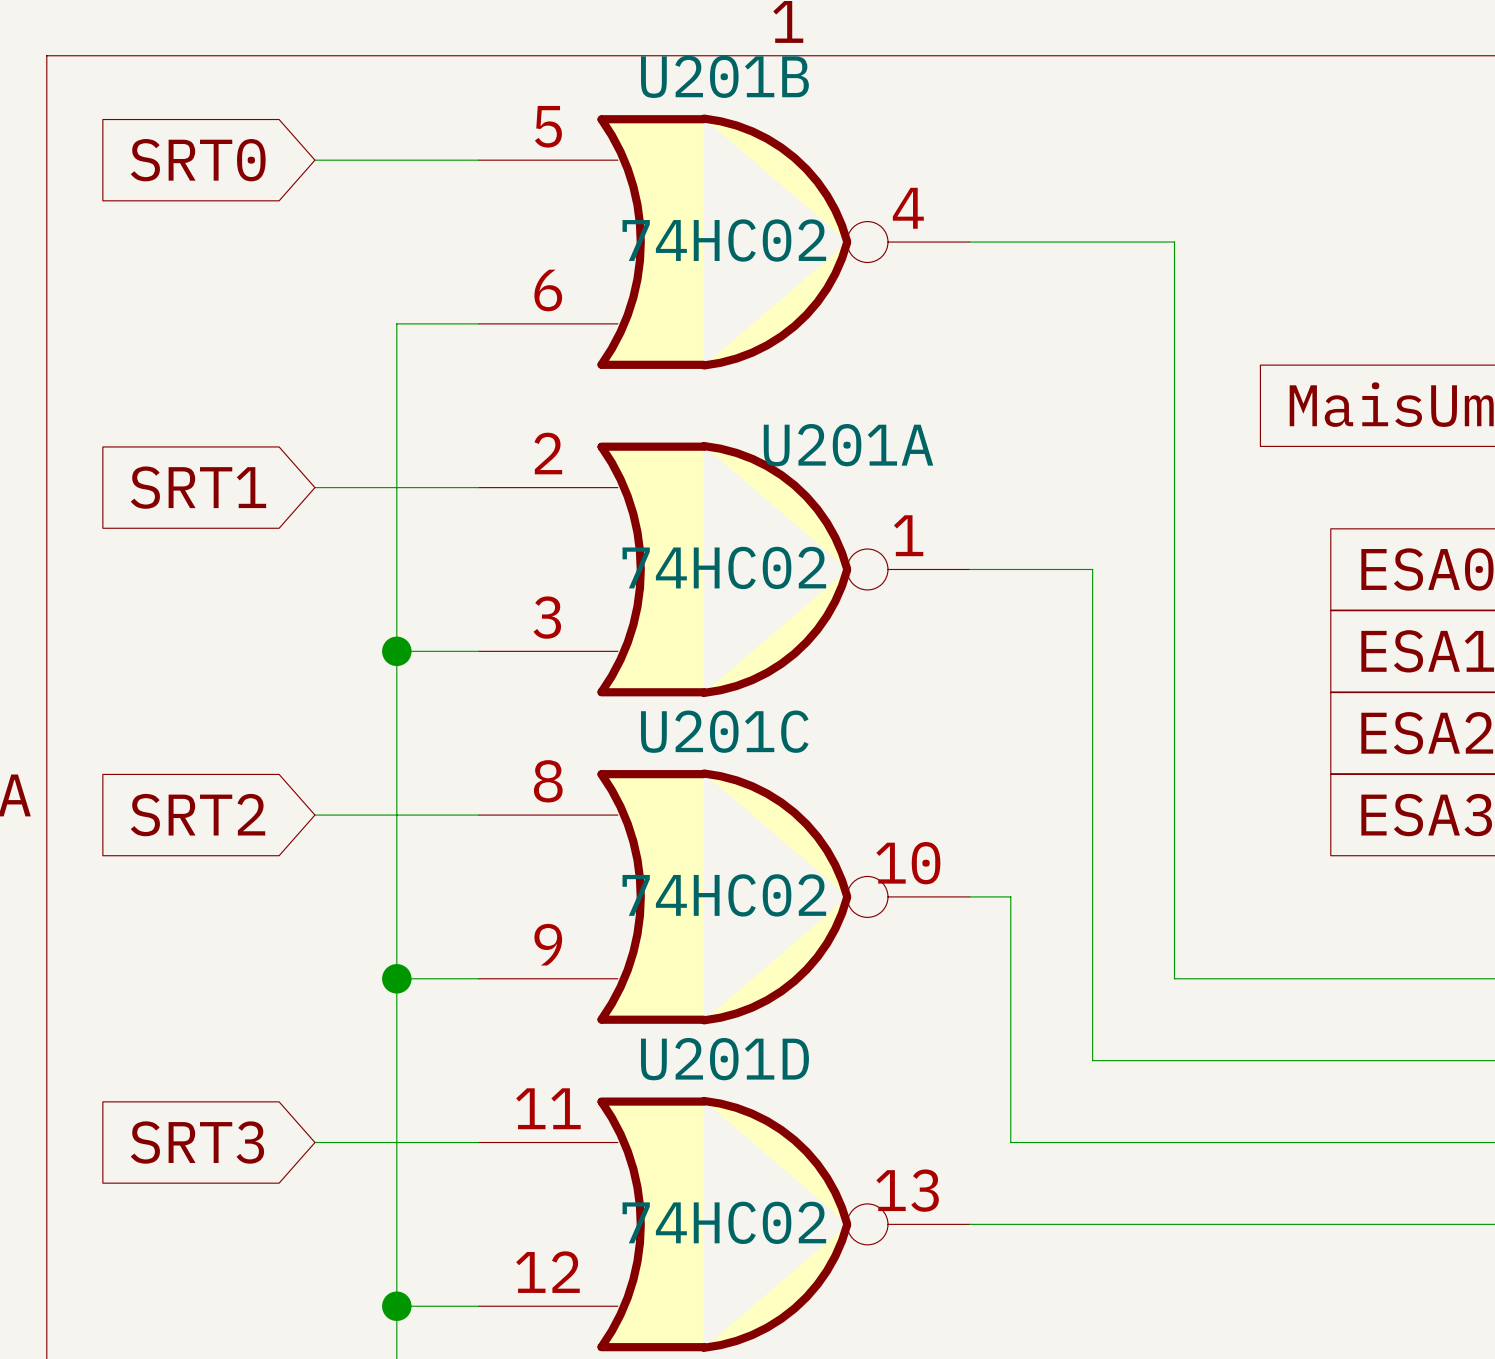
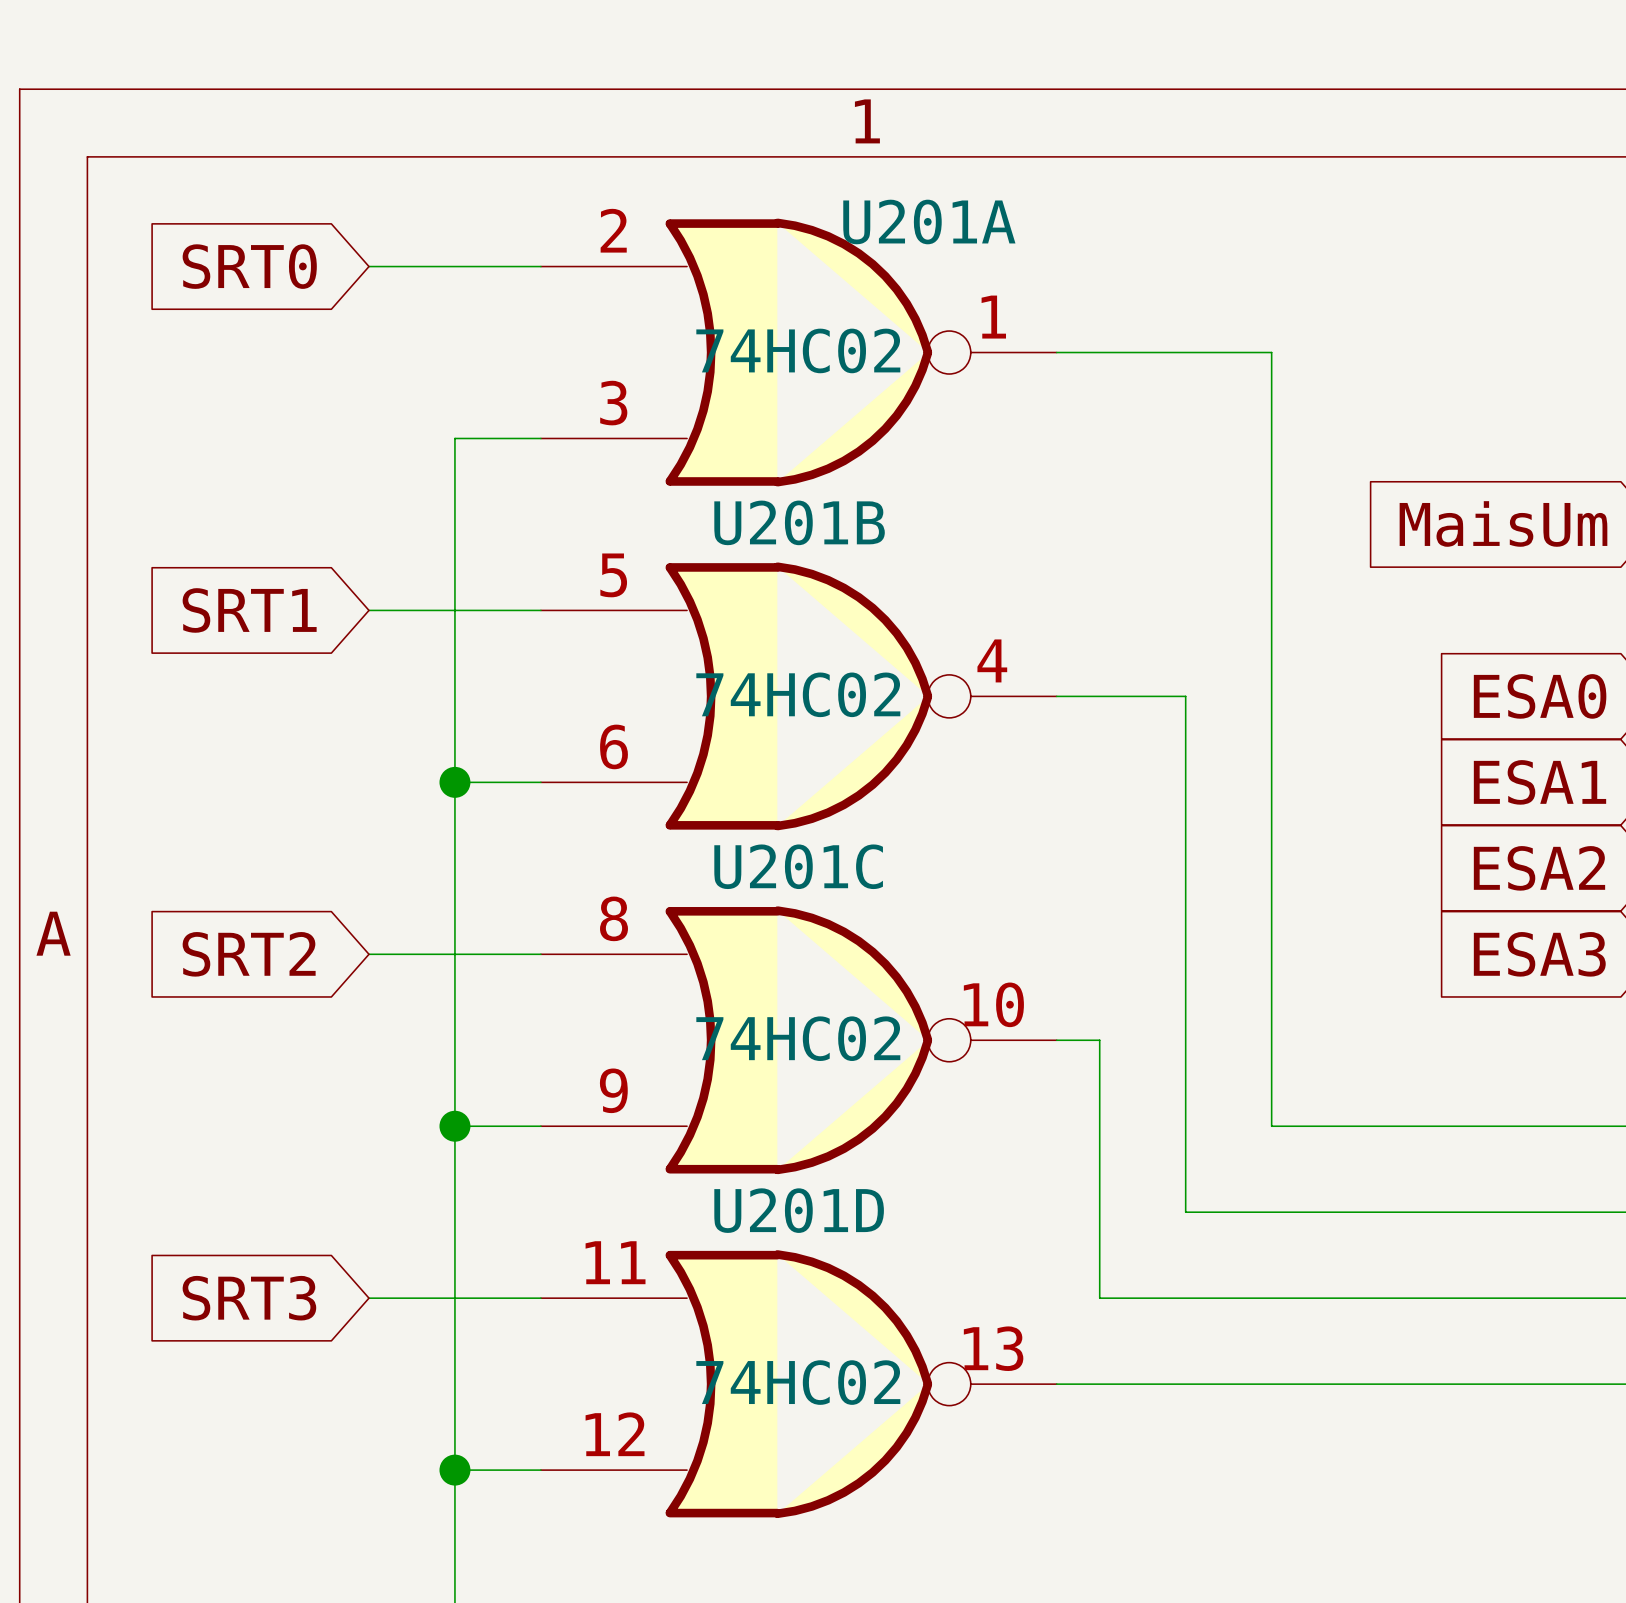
U201B position: (724, 242) -> (798, 696)
U201A position: (724, 569) -> (798, 352)

